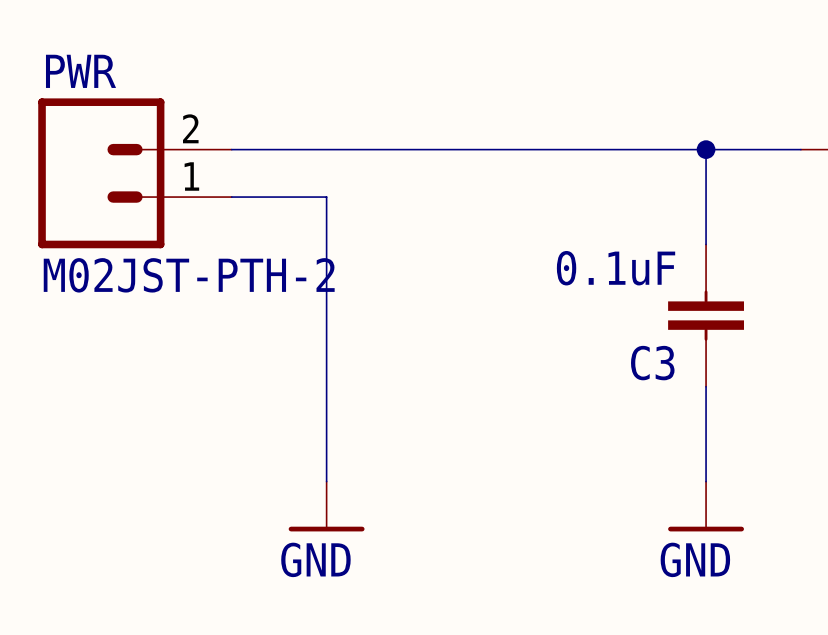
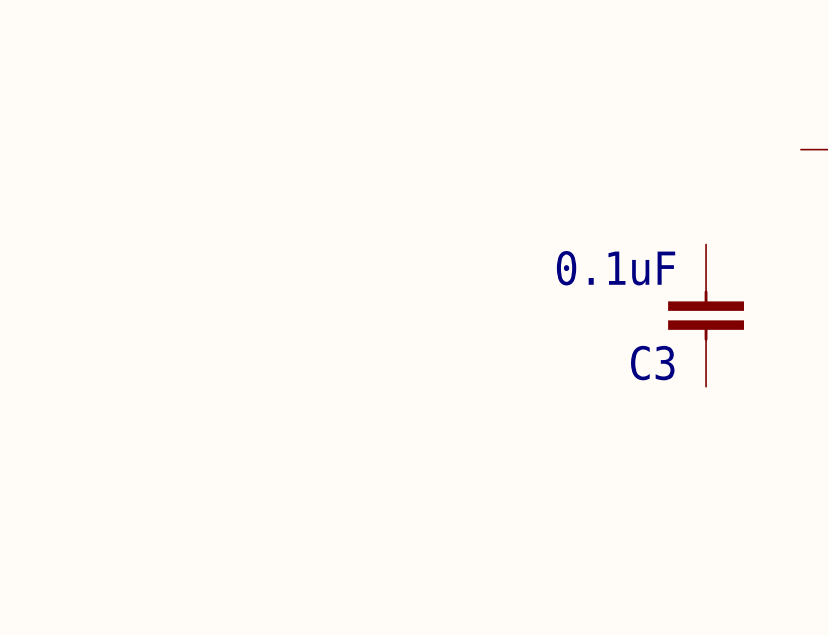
wire: (231, 149) (800, 149) -> none
wire: (706, 149) (706, 244) -> none
junction: (706, 149) -> none
PWR: M02JST-PTH-2 (134, 173) -> none
wire: (231, 197) (326, 197) (326, 481) -> none
wire: (706, 386) (706, 481) -> none
power symbol: GND (326, 506) -> none
power symbol: GND (706, 506) -> none

